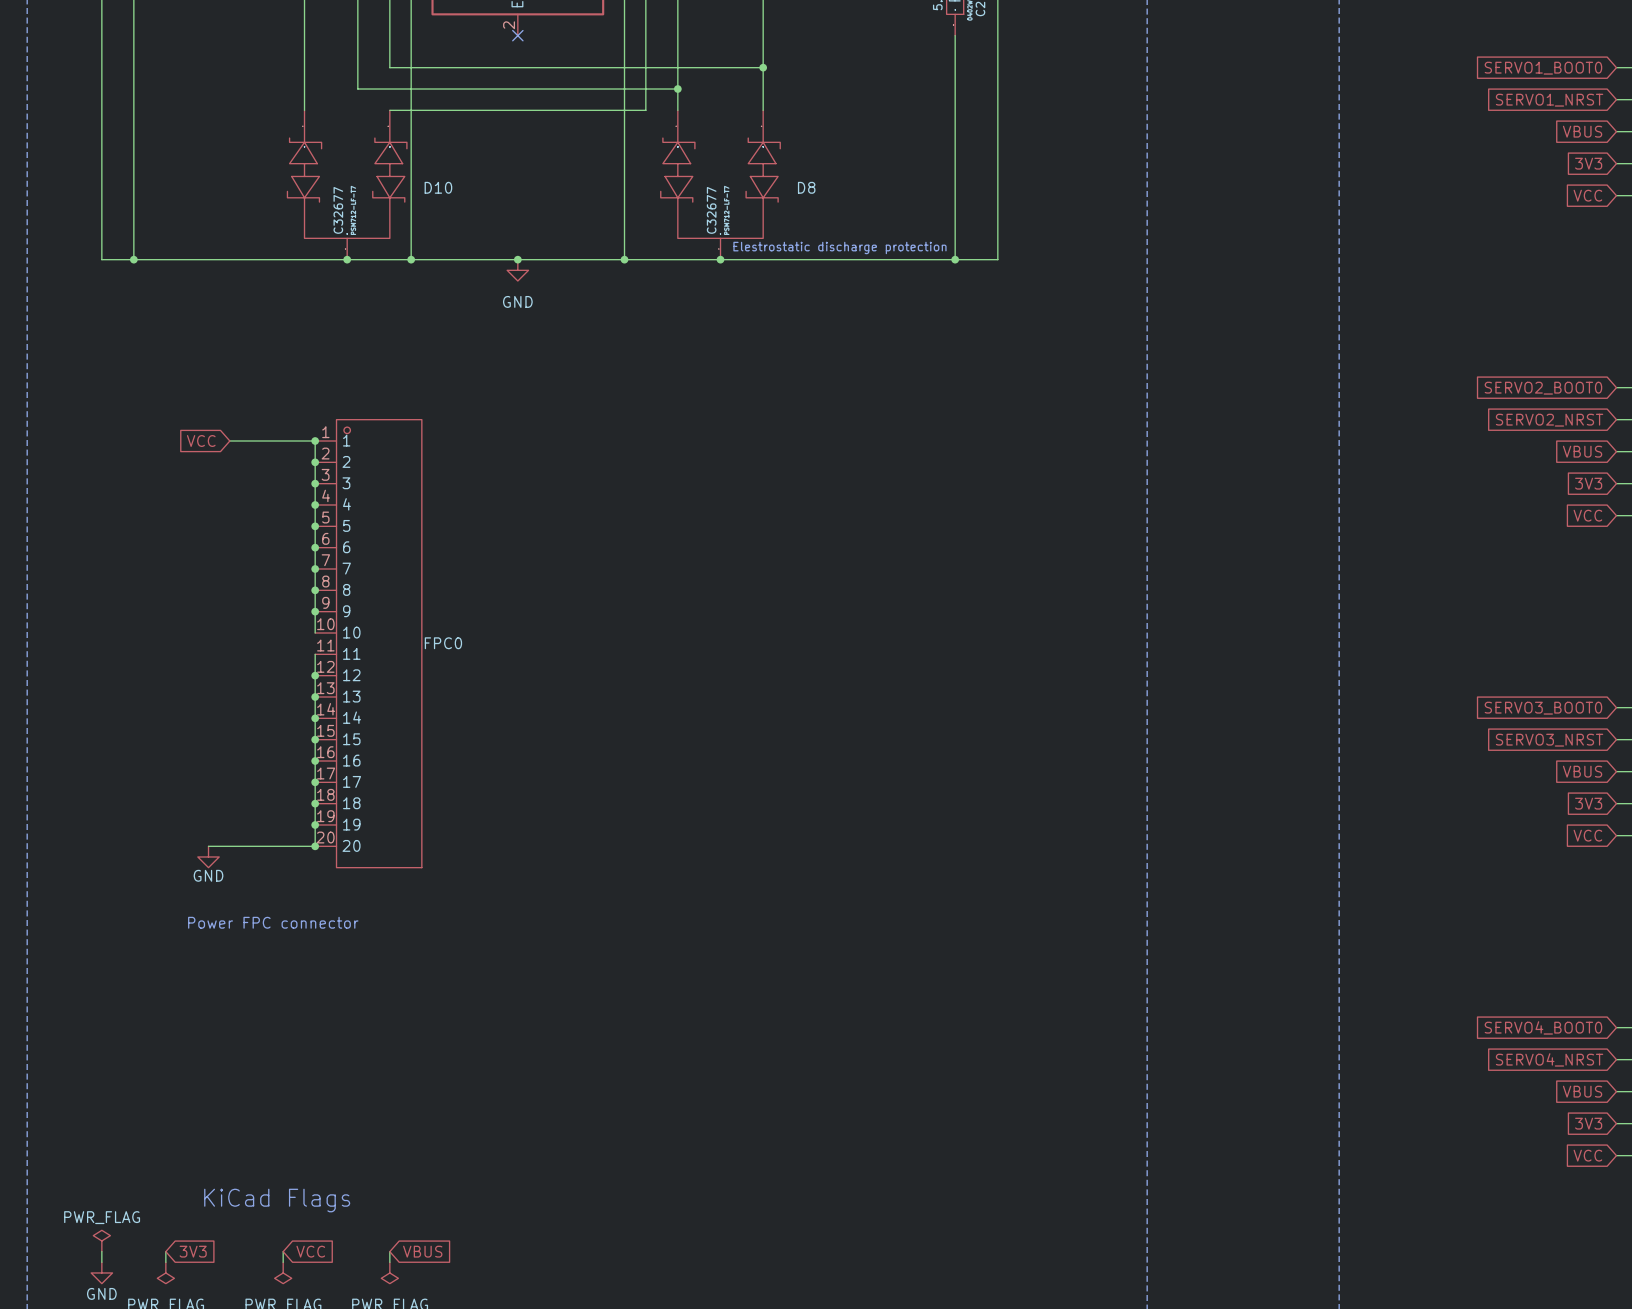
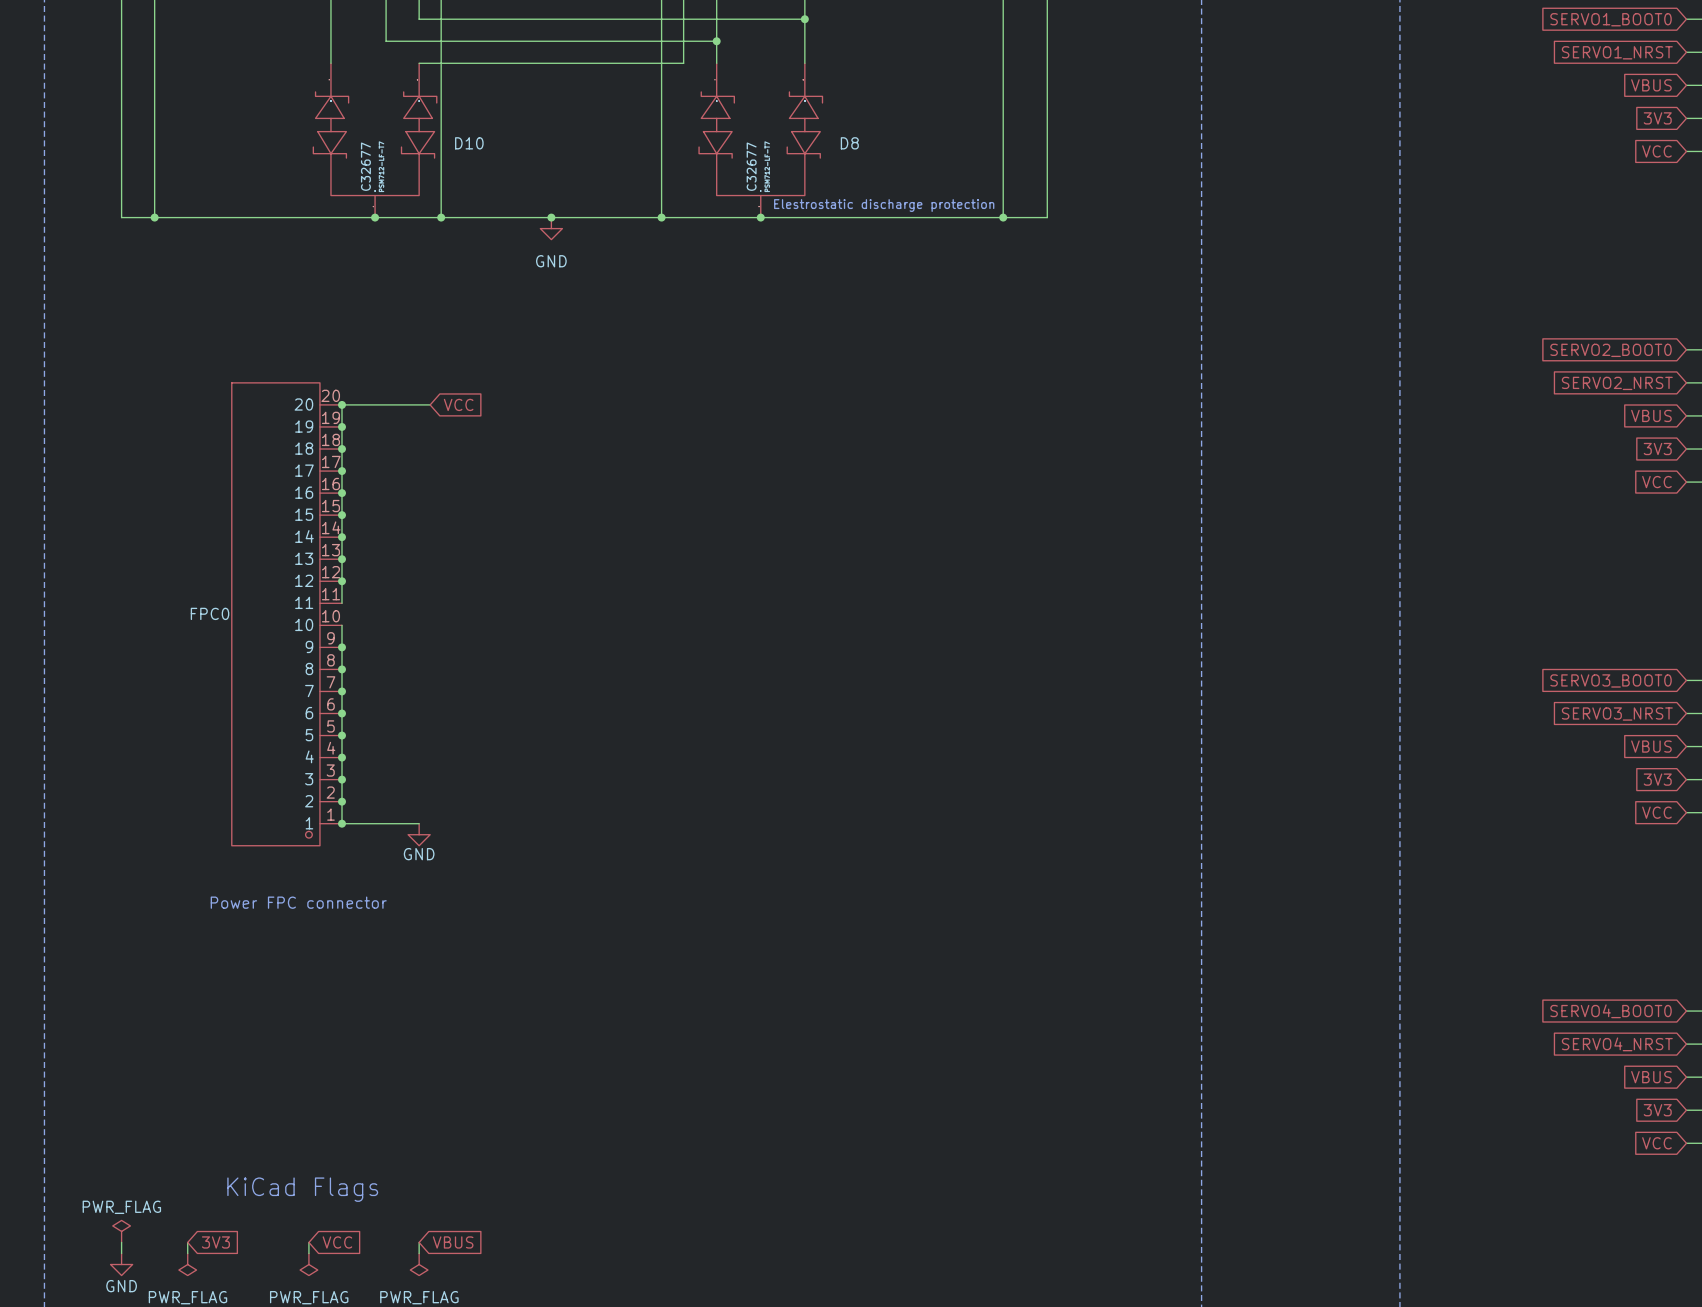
global label rotation: 0° (201, 441) -> 180° (458, 404)
global label position: VCC (201, 441) -> VCC (458, 404)
wire: (229, 441) (315, 441) -> (430, 404) (342, 404)
FPC0 rotation: 0° (379, 643) -> 180° (275, 614)
wire: (208, 846) (315, 846) -> (419, 823) (342, 823)
power symbol position: GND (208, 856) -> GND (419, 834)

